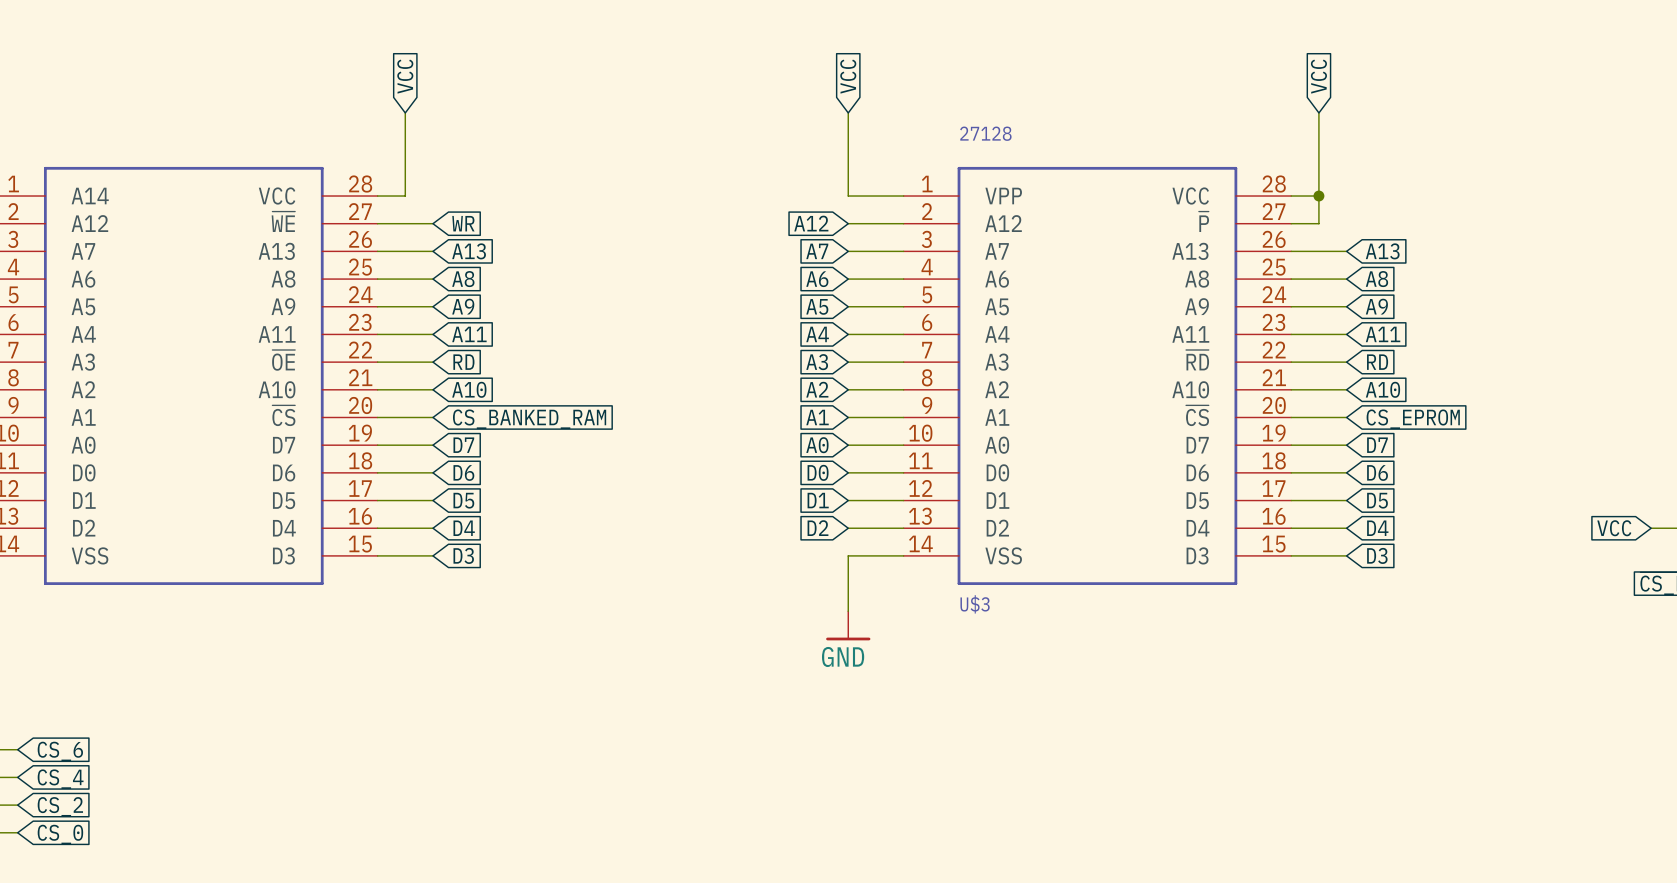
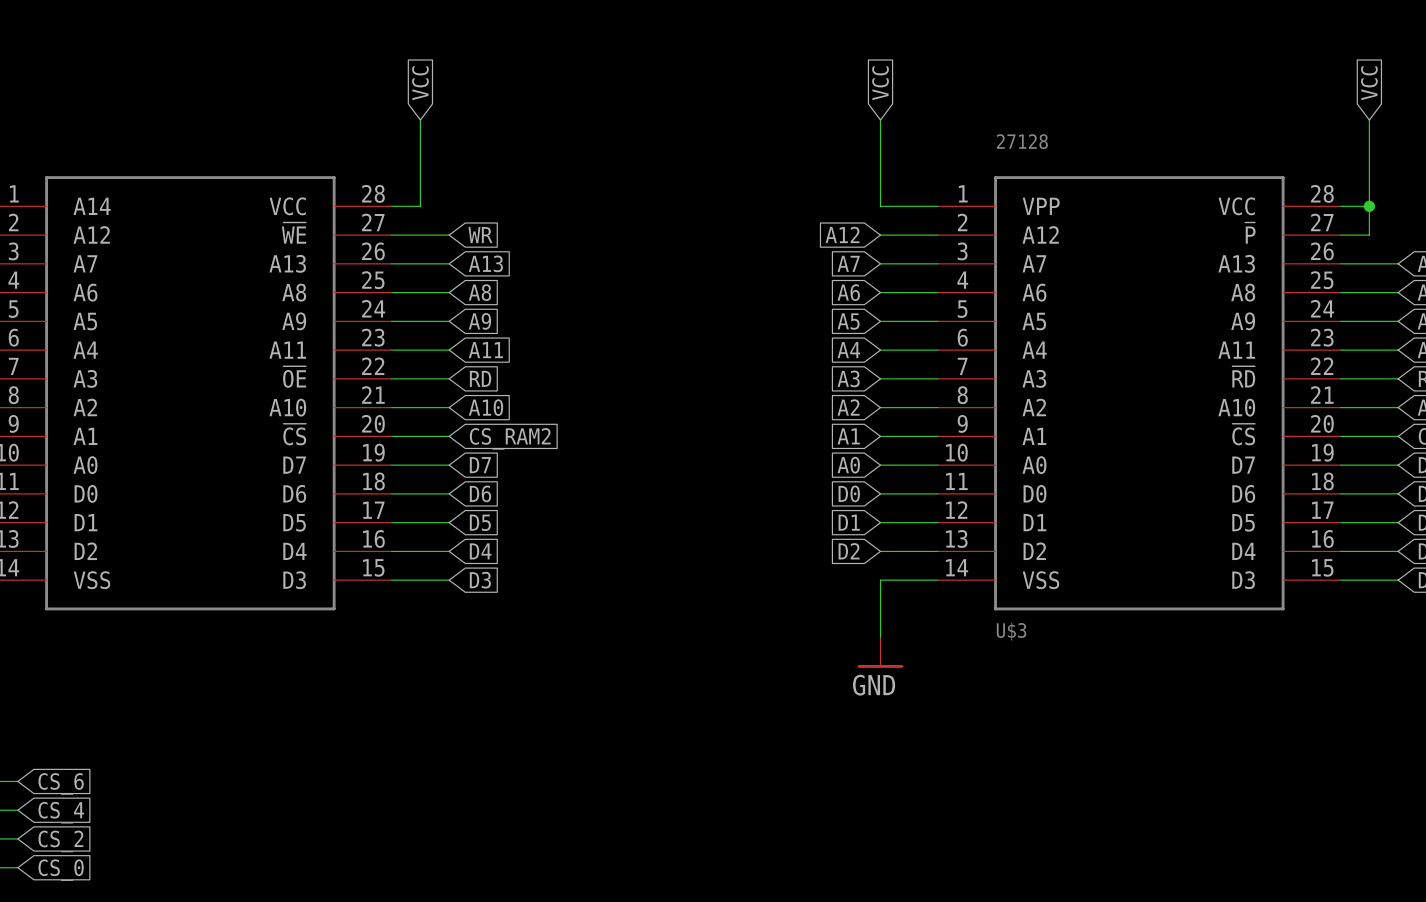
global label: CS_BANKED_RAM (529, 419) -> CS_RAM2 (510, 438)

